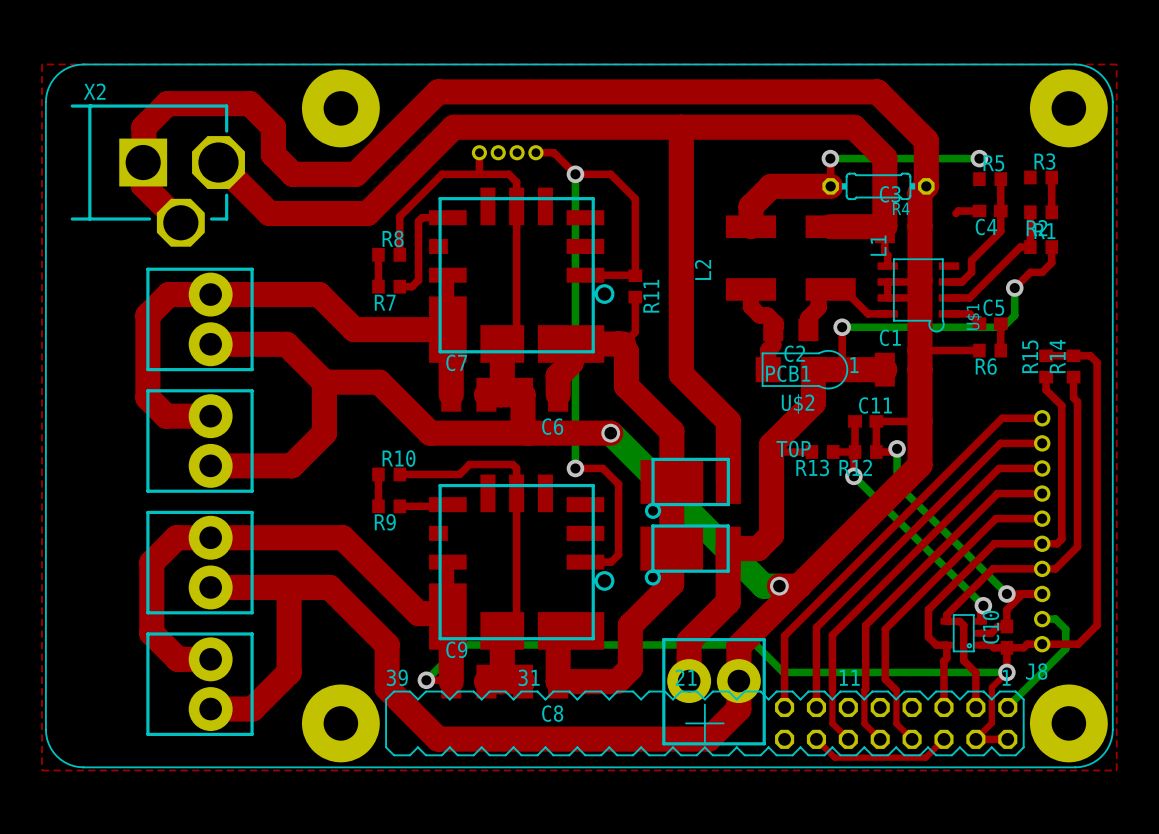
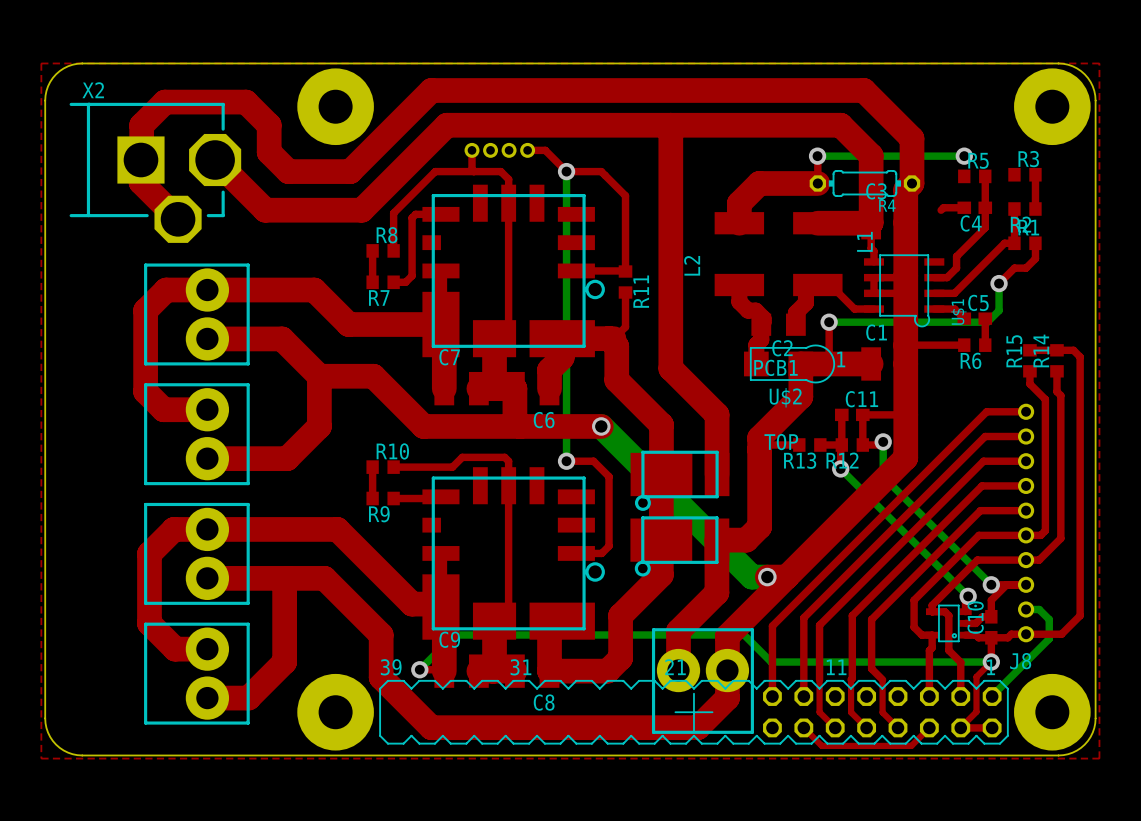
PCB1 footprint: [45, 63, 1114, 769] -> [44, 62, 1097, 757]

